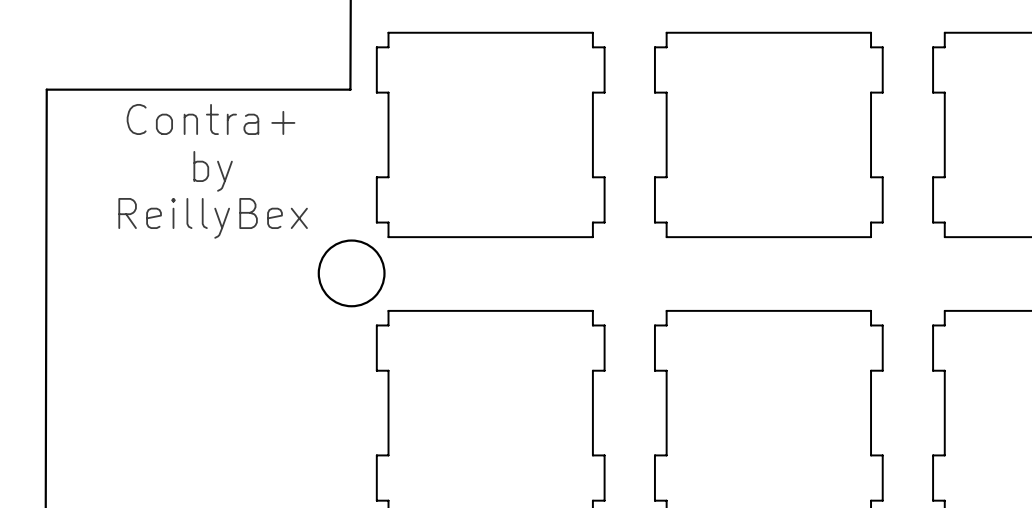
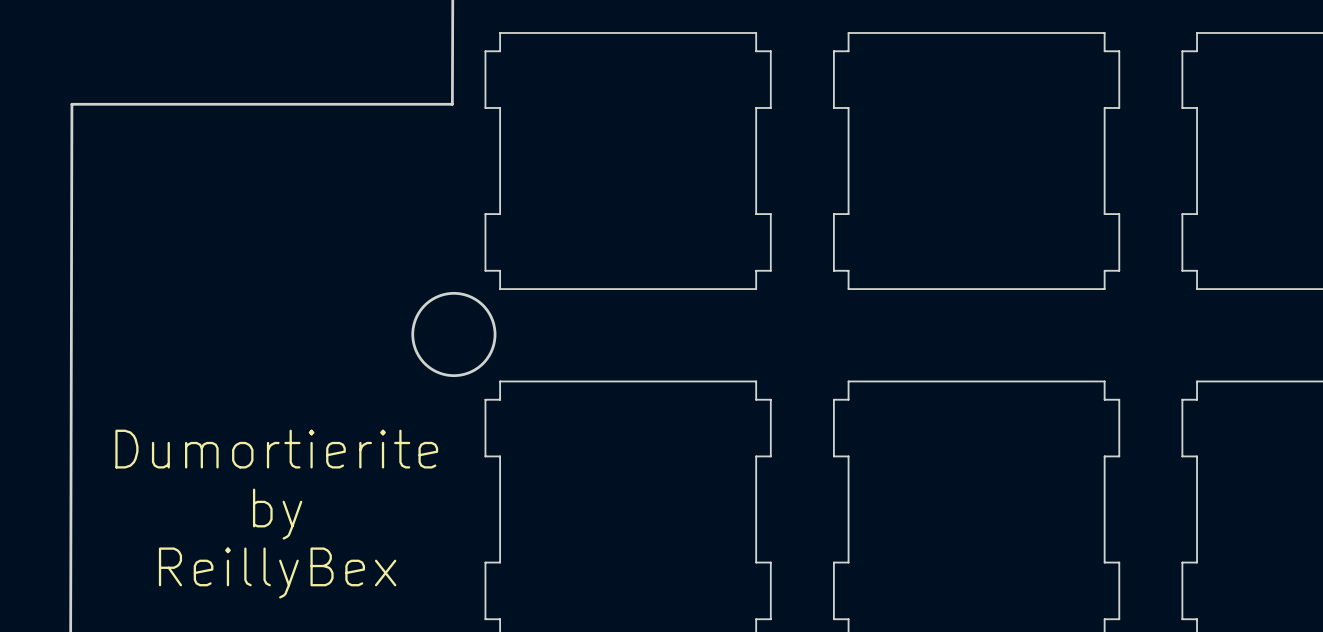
text: Contra+ (211, 119) -> none
text position: by (213, 171) -> by (277, 514)
text position: ReillyBex (213, 218) -> ReillyBex (277, 572)
text: none -> Dumortierite (276, 449)

